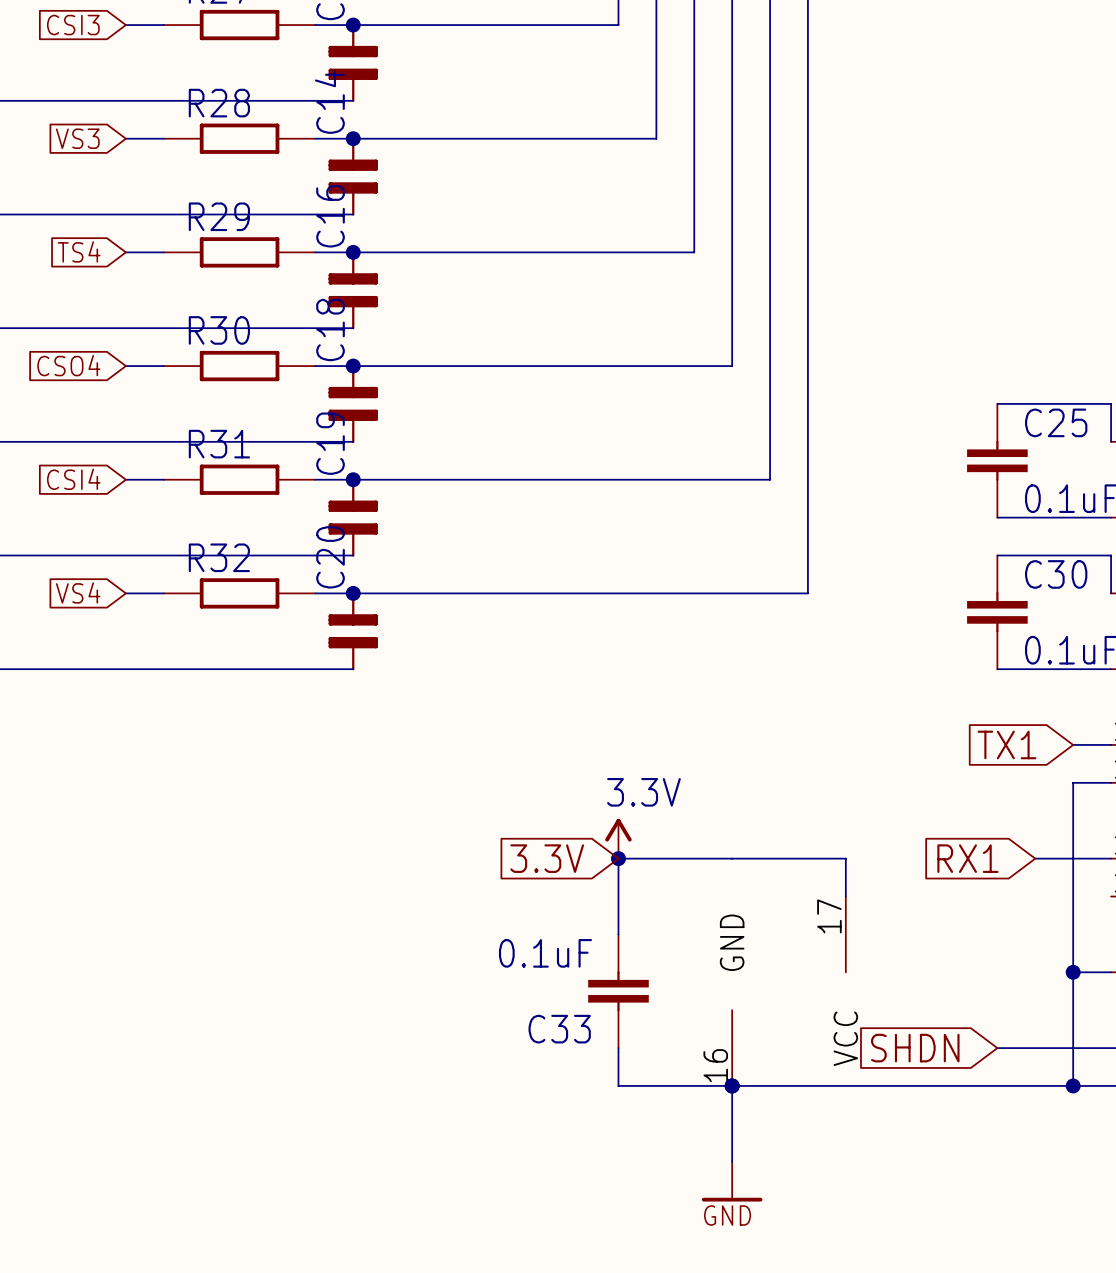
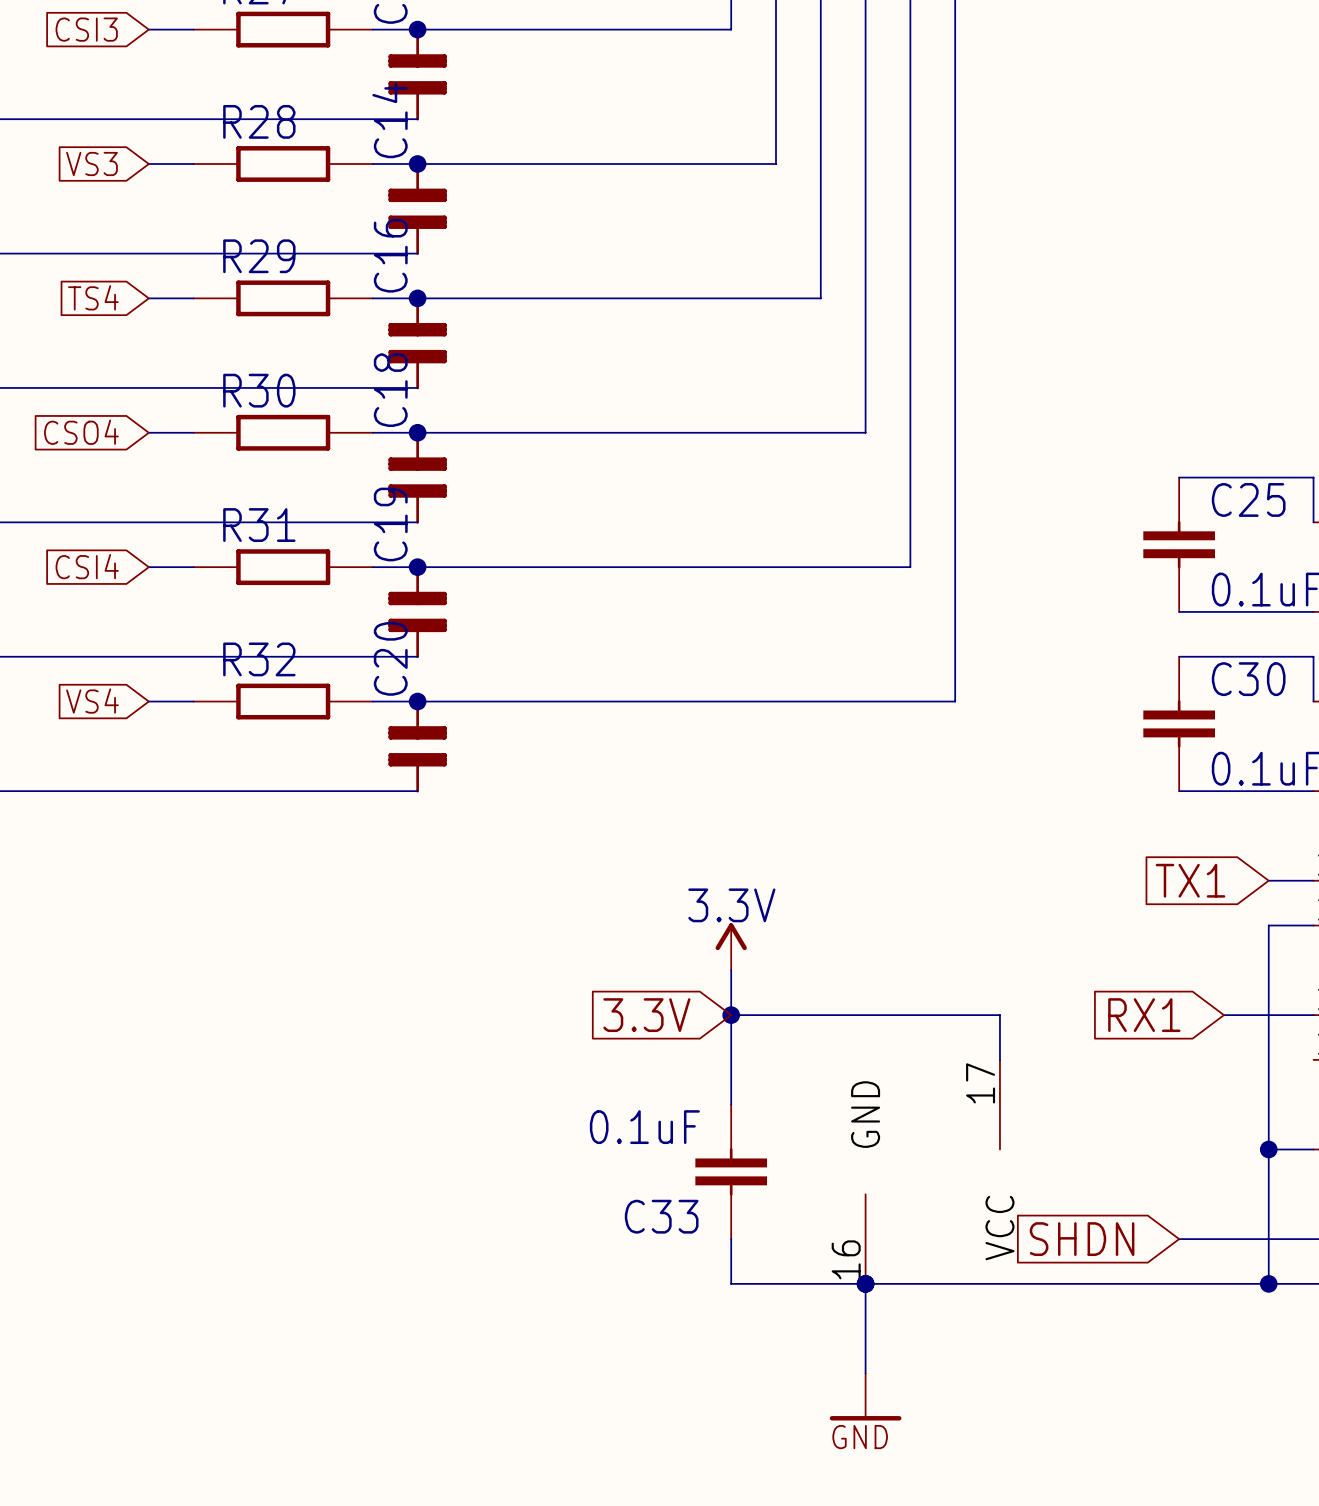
power symbol text position: 3.3V (643, 792) -> 3.3V (731, 905)
power symbol position: 3.3V (618, 838) -> 3.3V (731, 946)

